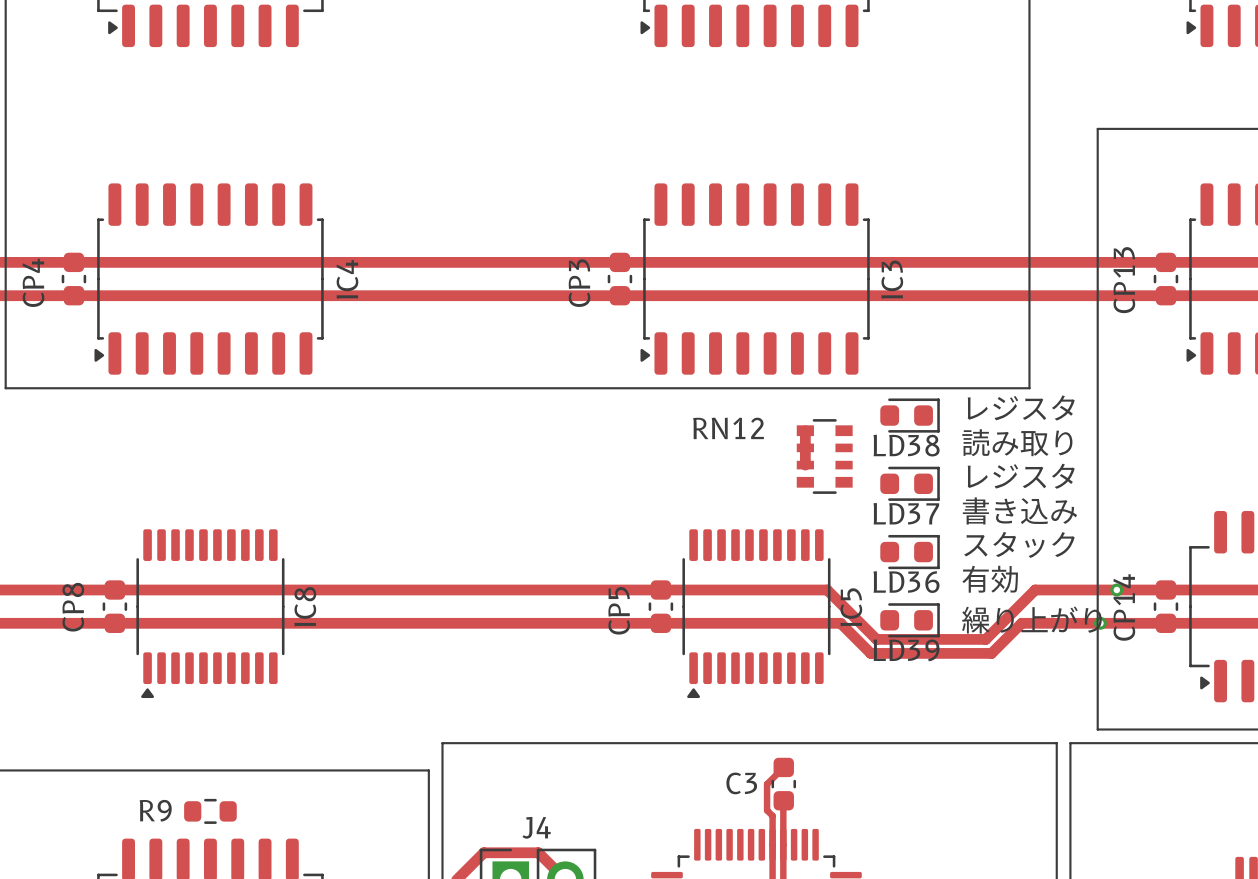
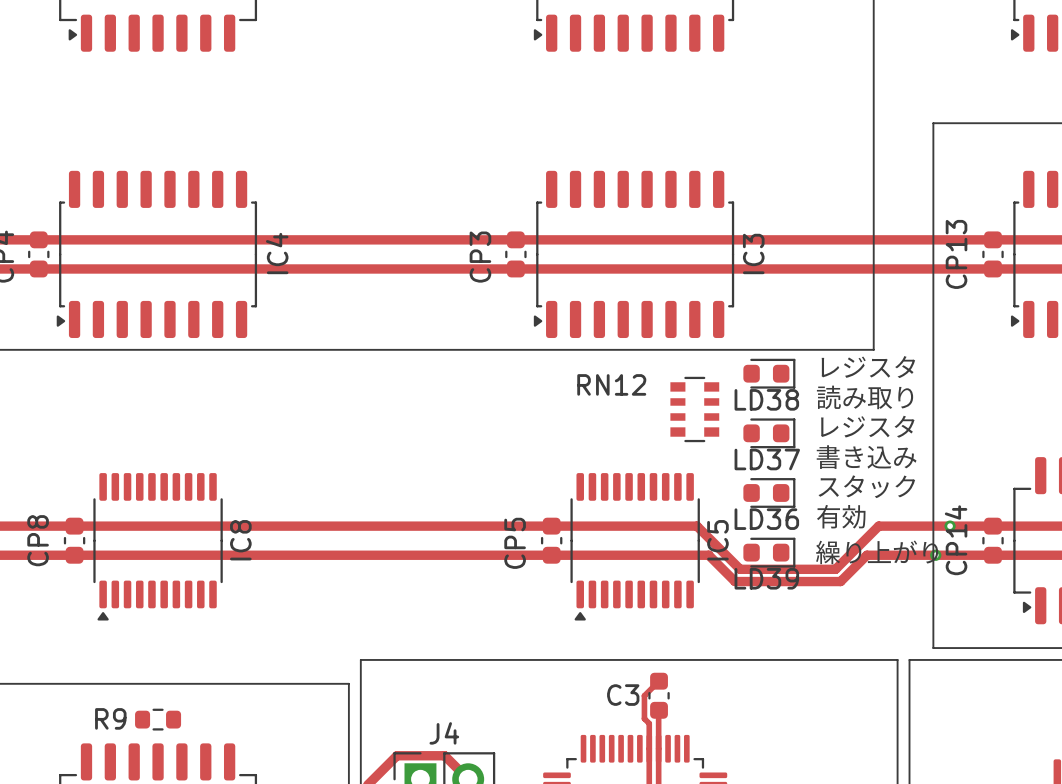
track: (805, 430) (805, 465) -> none

